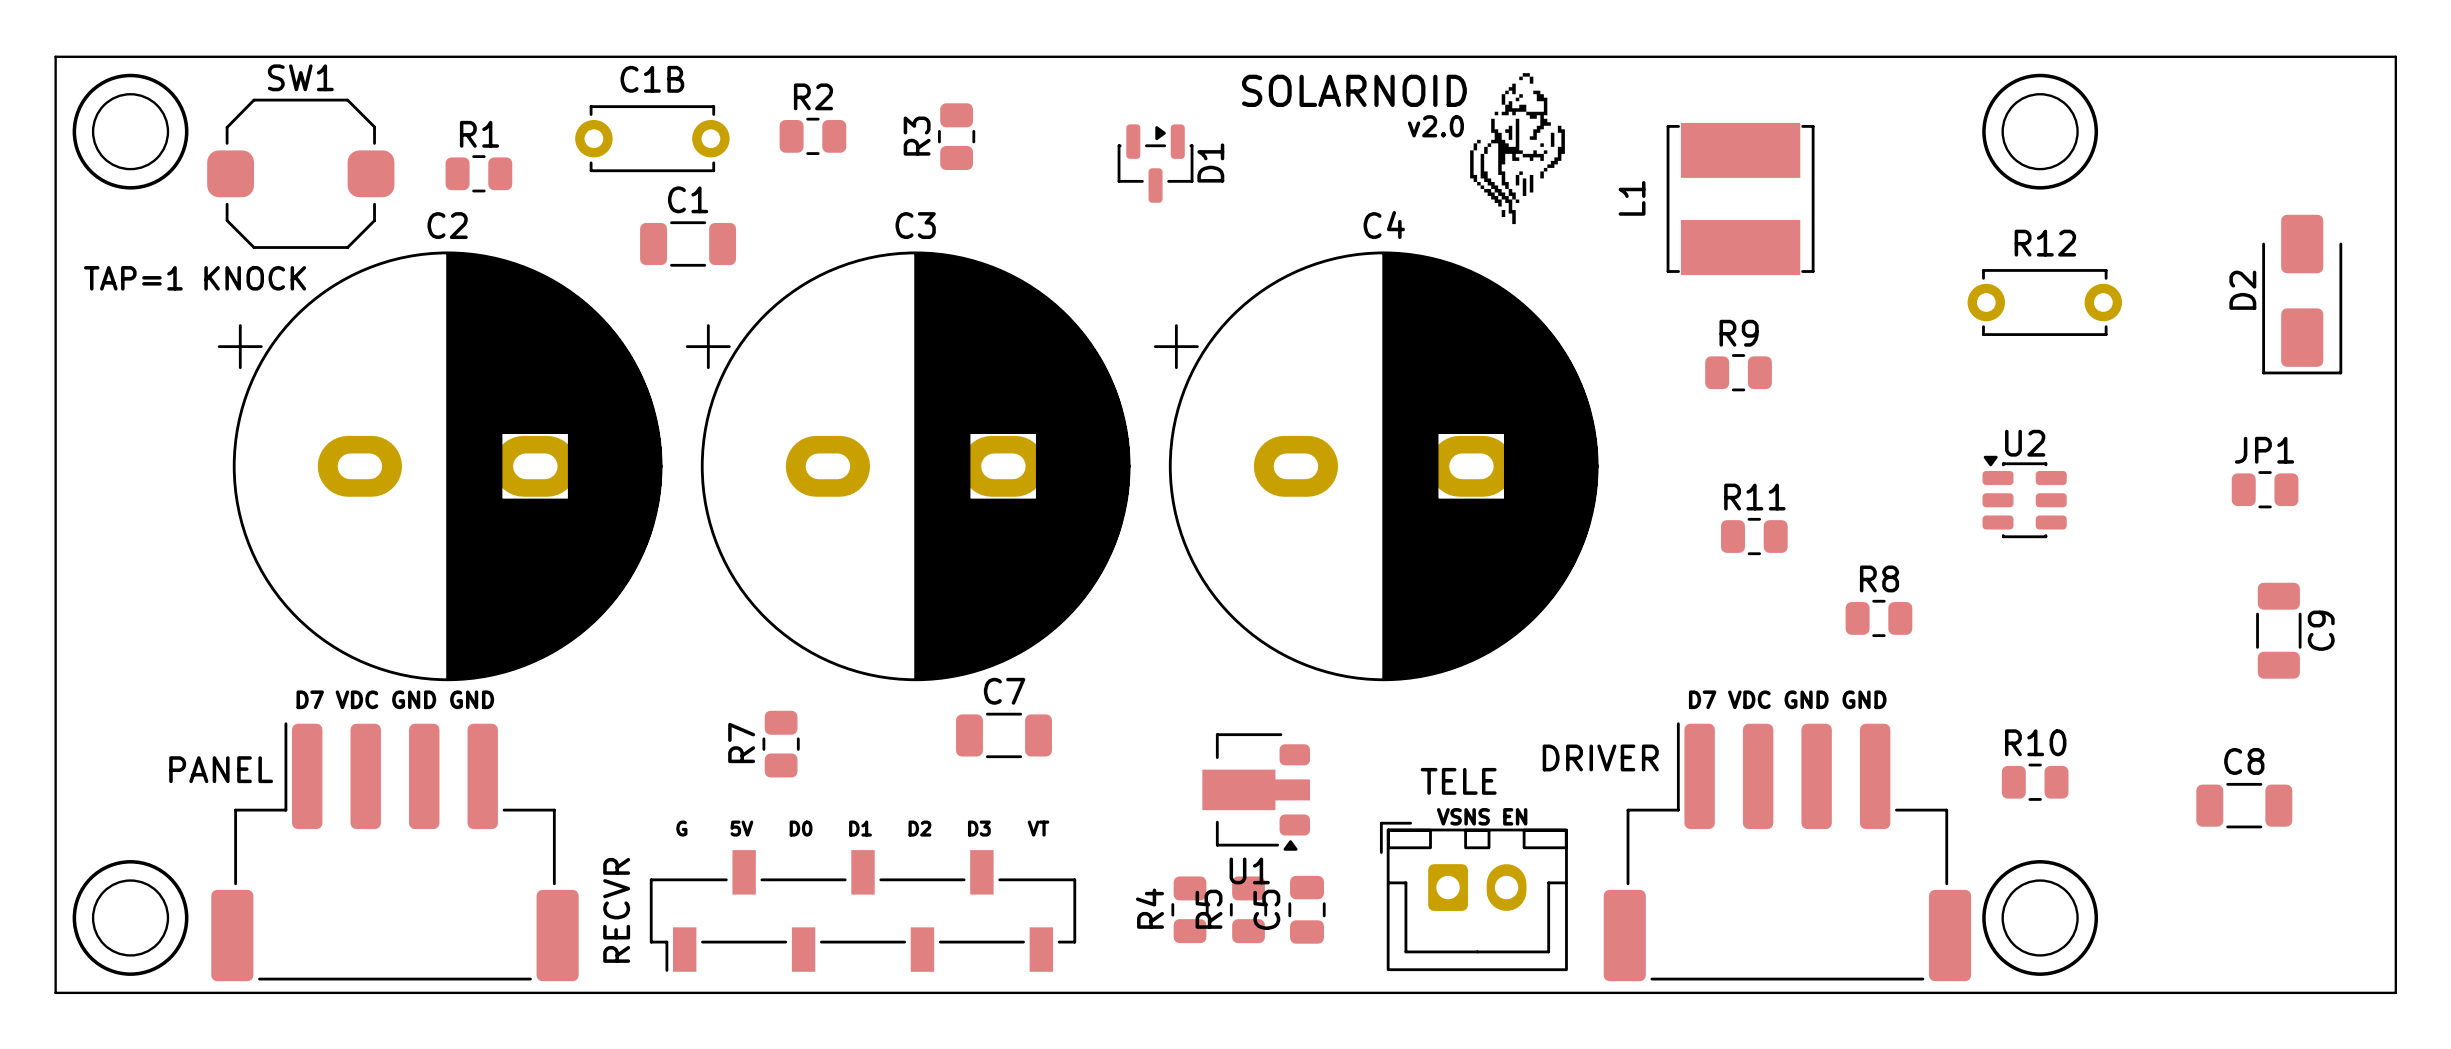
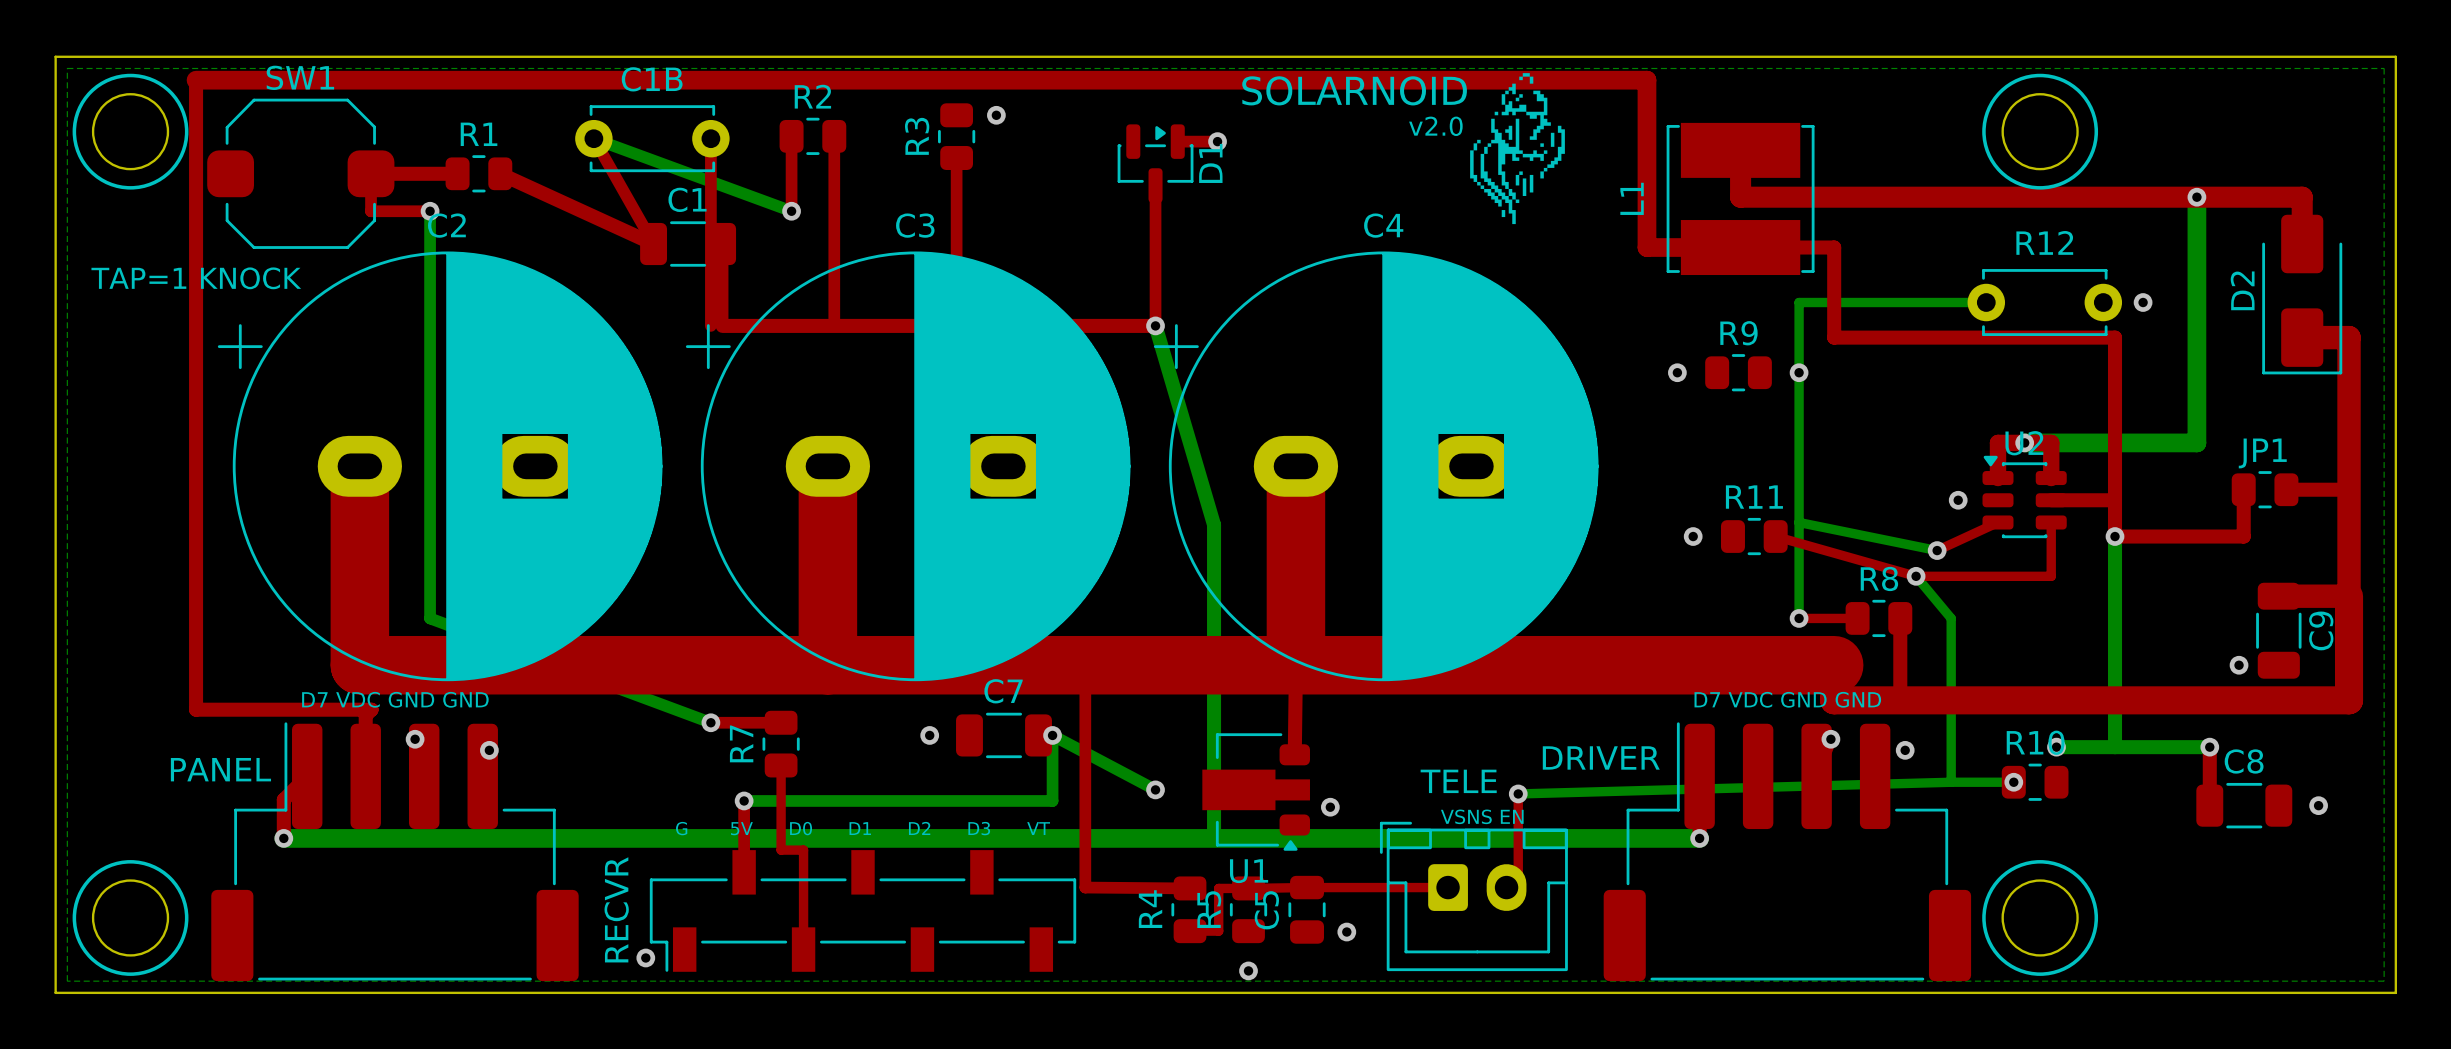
bottom zone outline: none -> (67, 68) (2384, 68) (2384, 981) (67, 981) (67, 68)
via: none -> (996, 115)
top track: none -> (791, 136) (791, 211)
top track: none -> (834, 136) (834, 325)
top track: none -> (593, 138) (653, 244) (500, 173)
bottom track: none -> (593, 138) (791, 211)
top track: none -> (710, 138) (710, 325)
top track: none -> (1177, 141) (1217, 141)
via: none -> (1217, 141)
top track: none -> (1740, 150) (1740, 197) (2302, 197) (2302, 244)
top track: none -> (956, 158) (956, 325)
top track: none -> (457, 173) (371, 173) (371, 211) (430, 211)
top track: none -> (1155, 185) (1155, 325) (722, 325) (722, 244)
bottom track: none -> (2196, 197) (2196, 442) (2024, 442)
via: none -> (2196, 197)
bottom track: none -> (430, 211) (430, 618) (710, 722)
via: none -> (430, 211)
via: none -> (791, 211)
bottom track: none -> (1986, 302) (1799, 302) (1799, 618)
via: none -> (2143, 302)
bottom track: none -> (1155, 325) (1214, 524) (1214, 838)
via: none -> (1155, 325)
top track: none -> (2302, 337) (2349, 337) (2349, 596)
via: none -> (1677, 372)
via: none -> (1799, 372)
via: none -> (2024, 442)
top track: none -> (359, 466) (359, 665) (1834, 665) (1834, 700) (2349, 700) (2349, 596)
top track: none -> (827, 466) (827, 665)
top track: none -> (1295, 466) (1294, 754)
top track: none -> (1998, 478) (1998, 442) (2051, 442) (2051, 478)
top track: none -> (2243, 489) (2243, 536) (2115, 536) (2115, 337) (1834, 337) (1834, 247) (1646, 247) (1646, 80) (196, 80) (196, 709) (371, 709) (365, 715) (365, 776)
top track: none -> (2286, 489) (2349, 489)
via: none -> (1958, 500)
top track: none -> (2051, 500) (2115, 500)
bottom track: none -> (1799, 522) (1937, 550)
top track: none -> (1998, 522) (1937, 550)
top track: none -> (2051, 522) (2051, 576) (1916, 576) (1775, 536)
via: none -> (1693, 536)
bottom track: none -> (2115, 536) (2115, 747)
via: none -> (2115, 536)
via: none -> (1937, 550)
bottom track: none -> (1916, 576) (1951, 618) (1951, 782)
via: none -> (1916, 576)
top track: none -> (2278, 596) (2349, 596)
top track: none -> (1799, 618) (1857, 618)
via: none -> (1799, 618)
top track: none -> (1900, 618) (1900, 700)
top track: none -> (1085, 665) (1085, 887) (1190, 888)
via: none -> (2239, 665)
top track: none -> (710, 722) (781, 722)
via: none -> (710, 722)
via: none -> (929, 735)
via: none -> (1052, 735)
via: none -> (415, 739)
via: none -> (1830, 739)
bottom track: none -> (2056, 747) (2209, 747)
via: none -> (2056, 747)
top track: none -> (2209, 747) (2209, 805)
via: none -> (2209, 747)
via: none -> (489, 750)
via: none -> (1905, 750)
top track: none -> (781, 765) (781, 850) (803, 850) (803, 949)
top track: none -> (307, 776) (283, 799) (283, 838)
bottom track: none -> (1951, 782) (1518, 793)
bottom track: none -> (1951, 782) (2013, 782)
via: none -> (2013, 782)
bottom track: none -> (1155, 789) (1052, 735) (1052, 800) (744, 800)
via: none -> (1155, 789)
top track: none -> (1518, 793) (1518, 875) (1506, 887)
via: none -> (1518, 793)
top track: none -> (744, 800) (744, 872)
via: none -> (744, 800)
via: none -> (2318, 805)
via: none -> (1330, 807)
bottom track: none -> (283, 838) (1699, 838)
via: none -> (283, 838)
via: none -> (1699, 838)
top track: none -> (1459, 887) (1218, 888) (1218, 931) (1190, 931)
via: none -> (1346, 932)
via: none -> (645, 957)
via: none -> (1248, 970)

